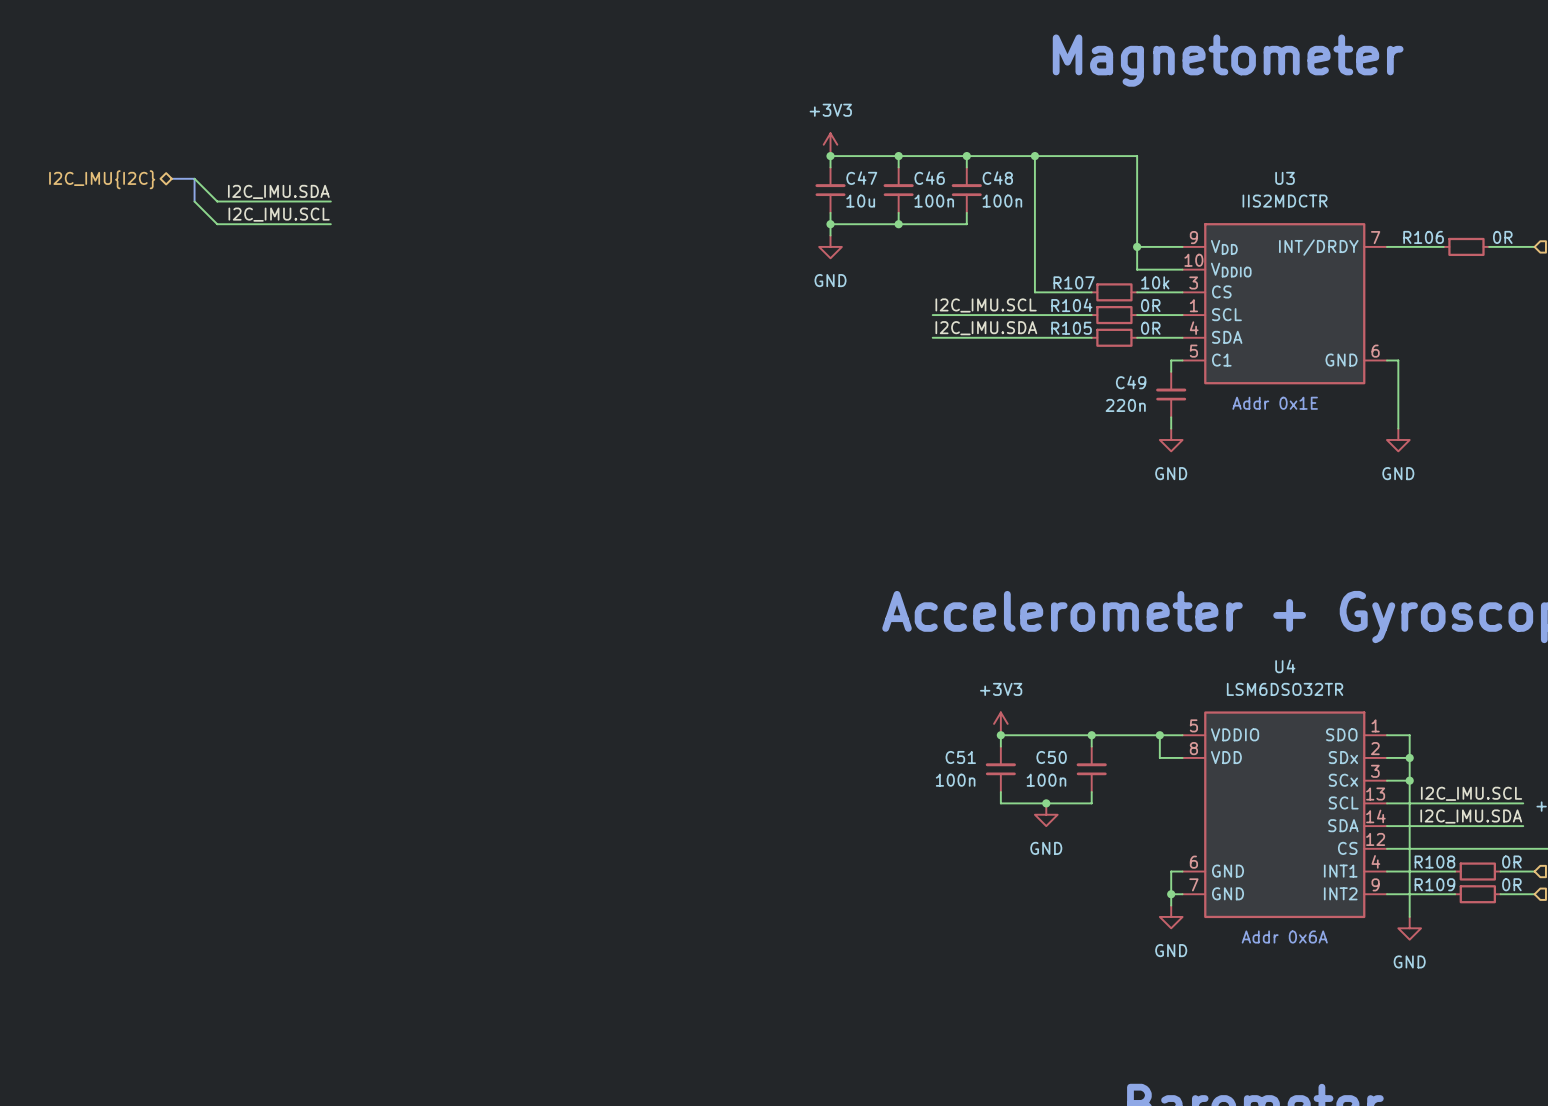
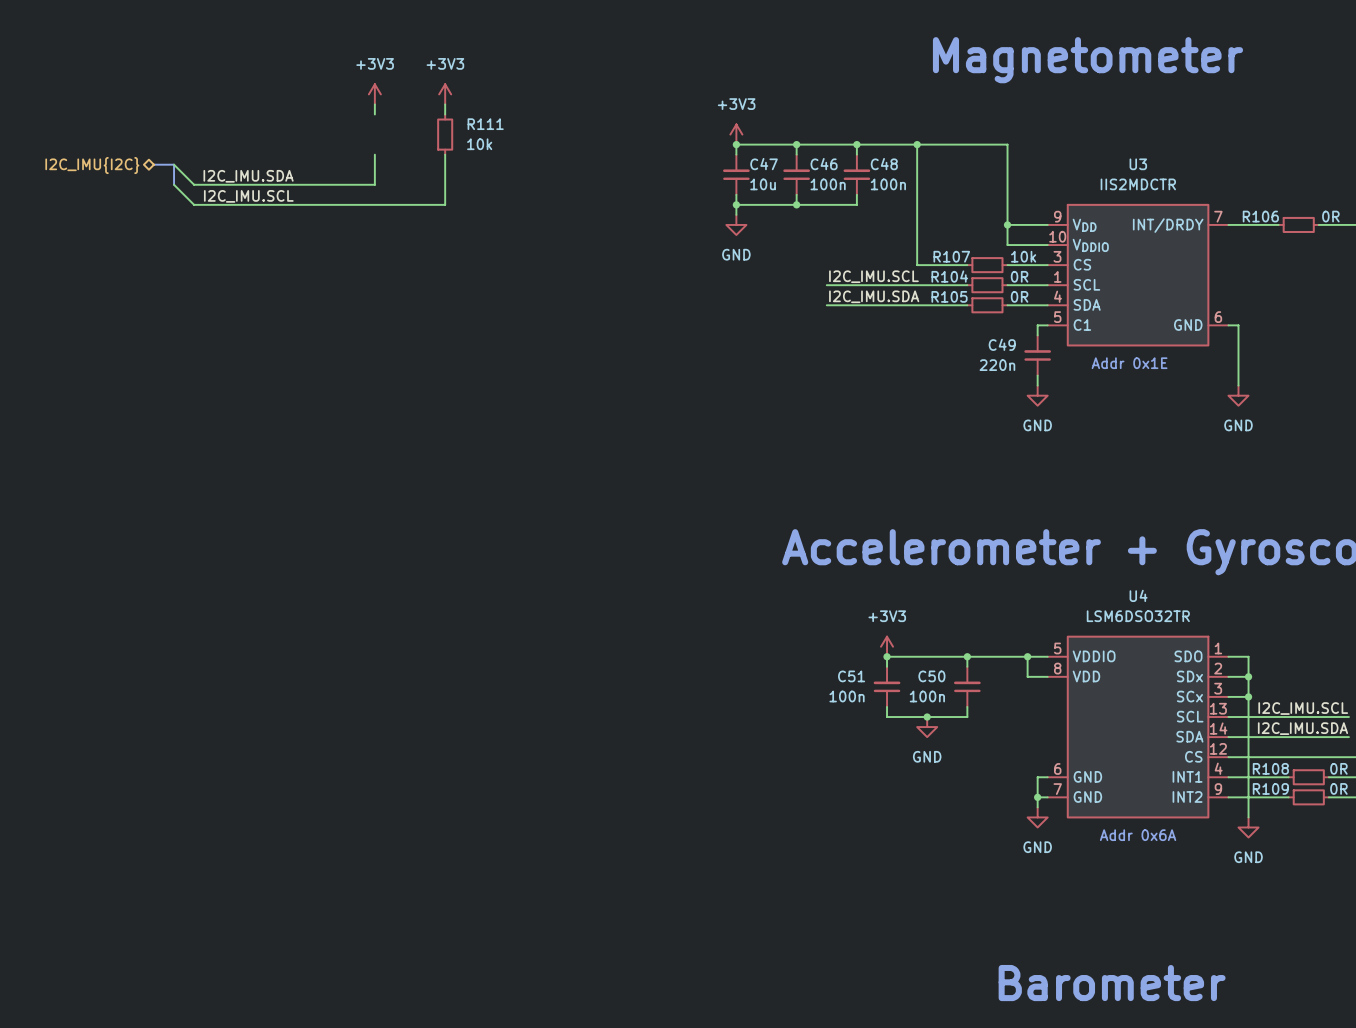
power symbol: none -> +3V3 (374, 94)
power symbol: none -> +3V3 (445, 94)
wire: none -> (374, 104) (374, 114)
wire: none -> (445, 104) (445, 114)
R111: none -> (445, 134)
wire: none -> (374, 154) (374, 184) (294, 184)
wire: none -> (445, 154) (445, 204) (294, 204)

